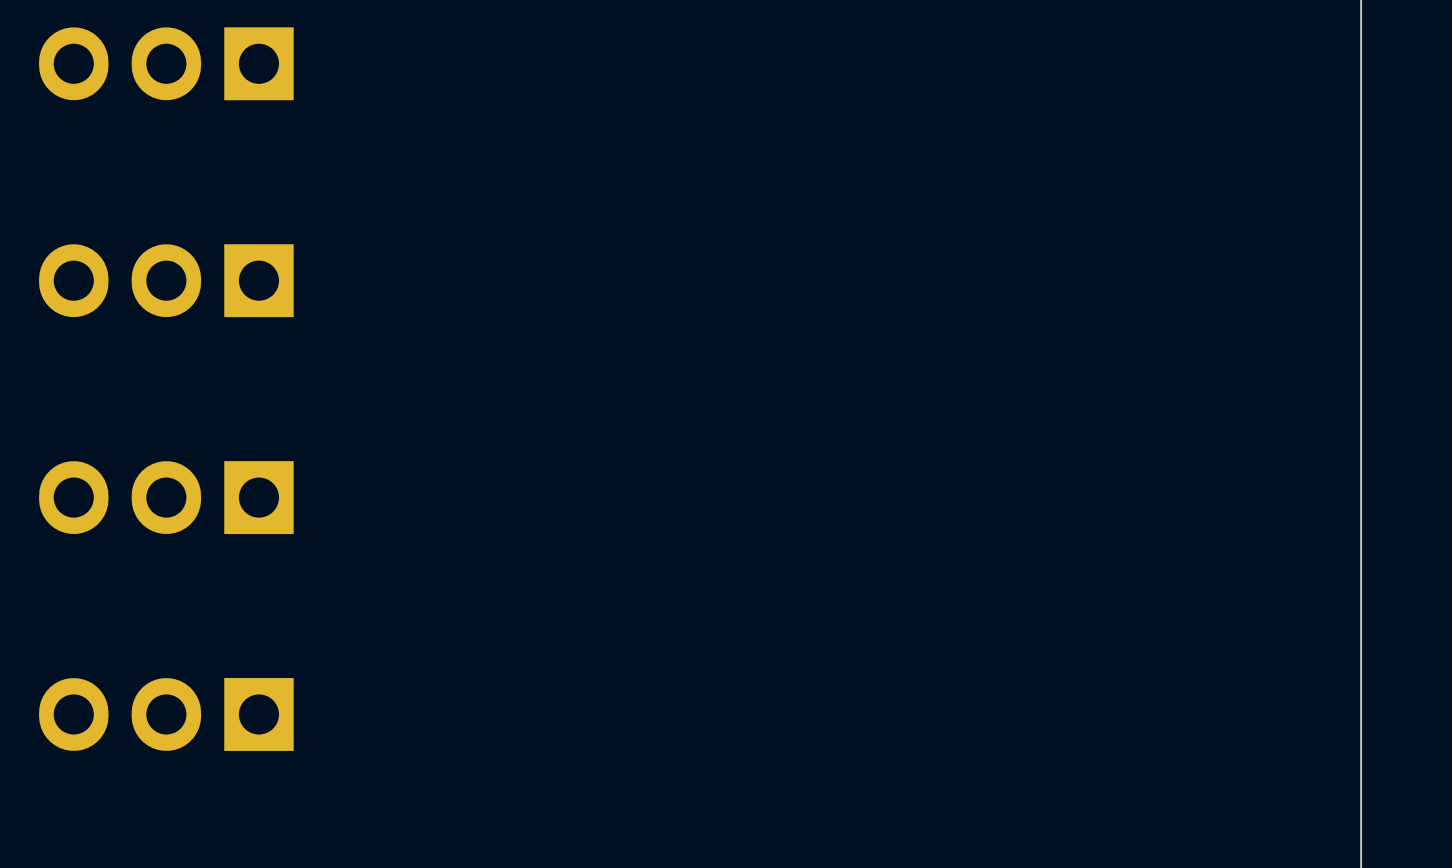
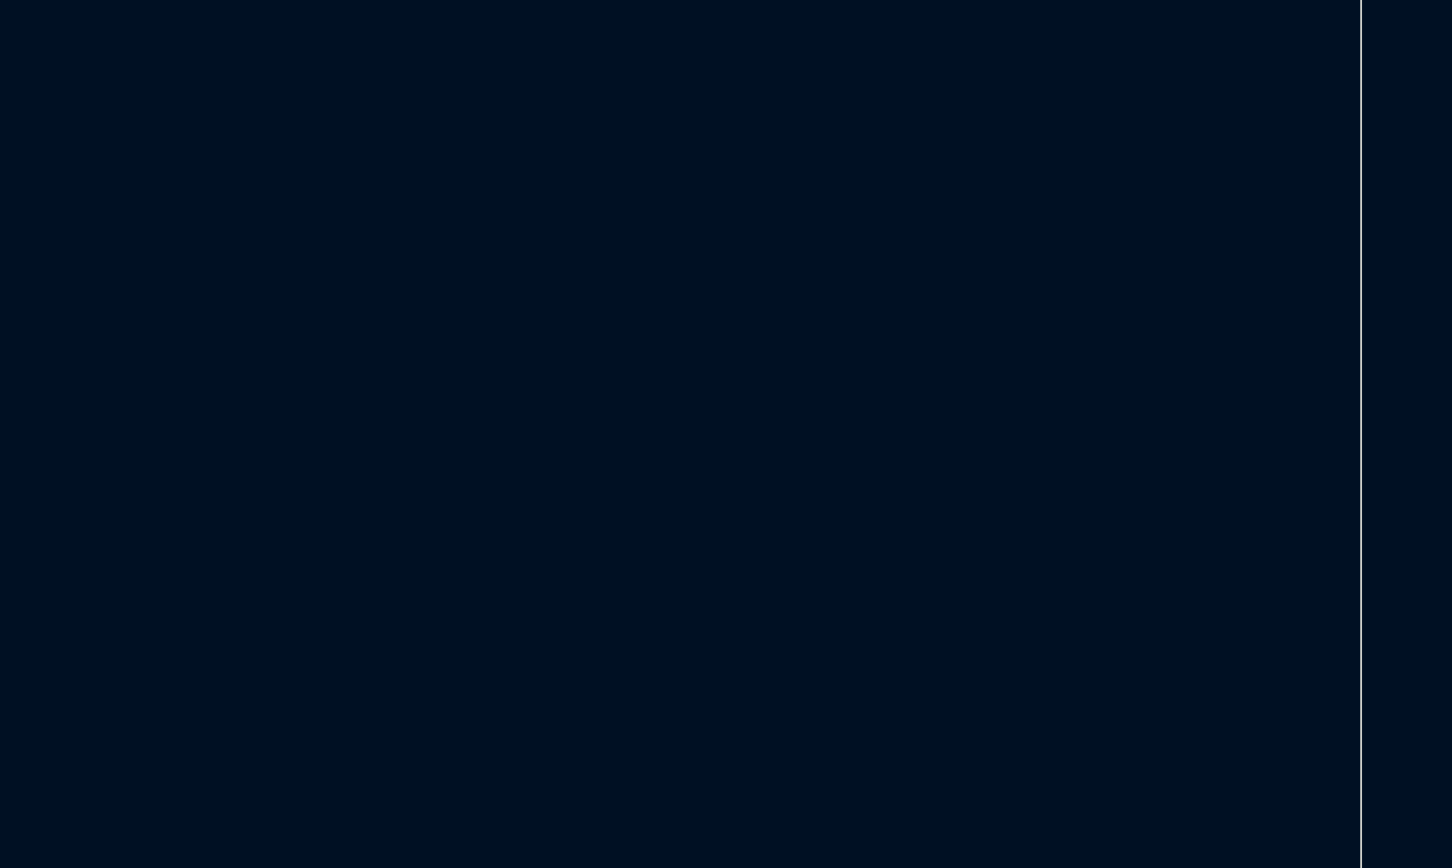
part: (166, 63) -> none
part: (166, 280) -> none
part: (166, 497) -> none
part: (166, 714) -> none

